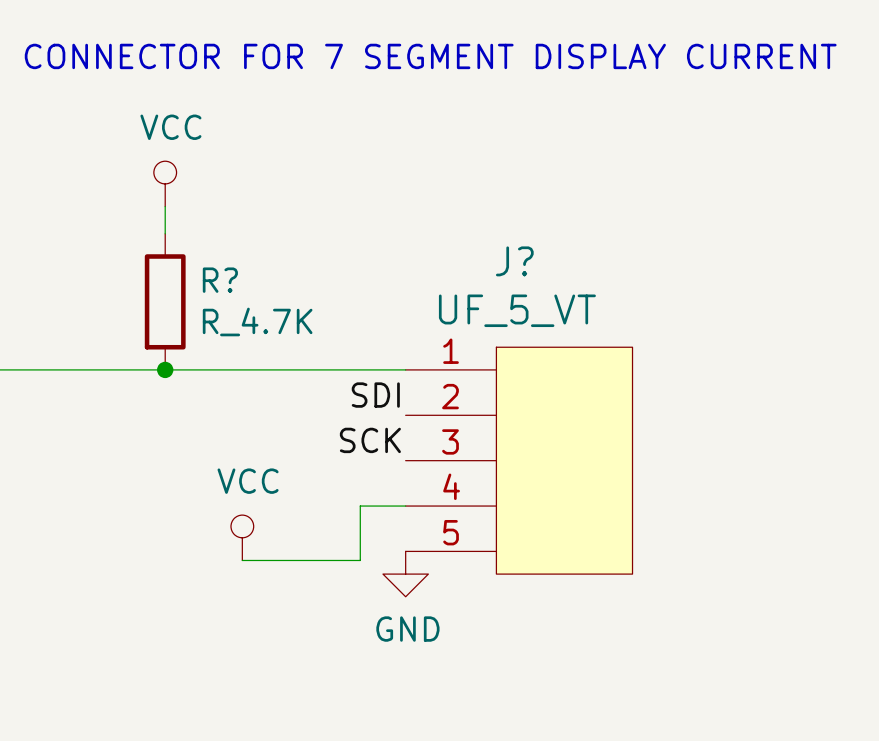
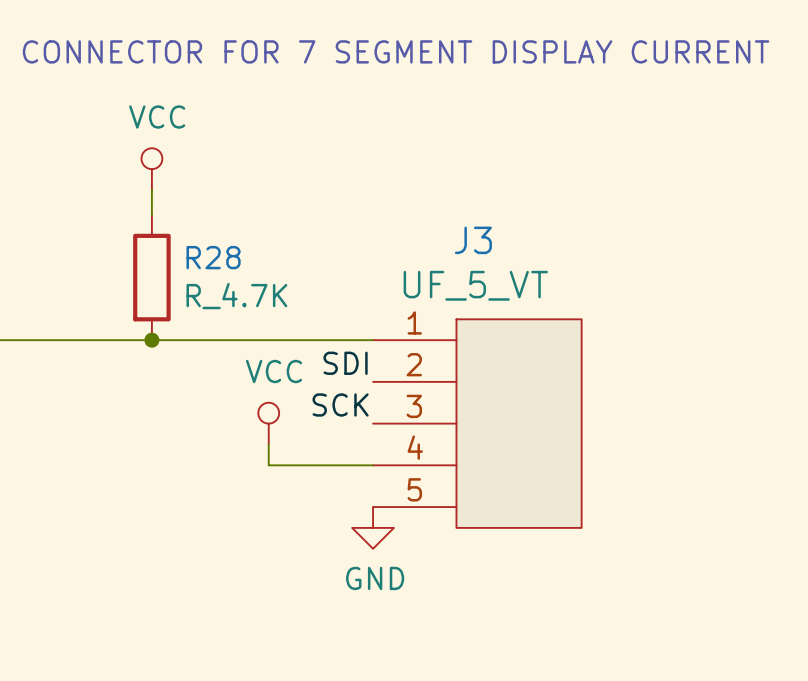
J? name: J? (514, 261) -> J3 (473, 240)
R? name: R? (220, 280) -> R28 (213, 257)
wire: (360, 506) (360, 560) (242, 560) -> (331, 465) (268, 465) (268, 444)
power symbol position: VCC (242, 537) -> VCC (268, 423)

